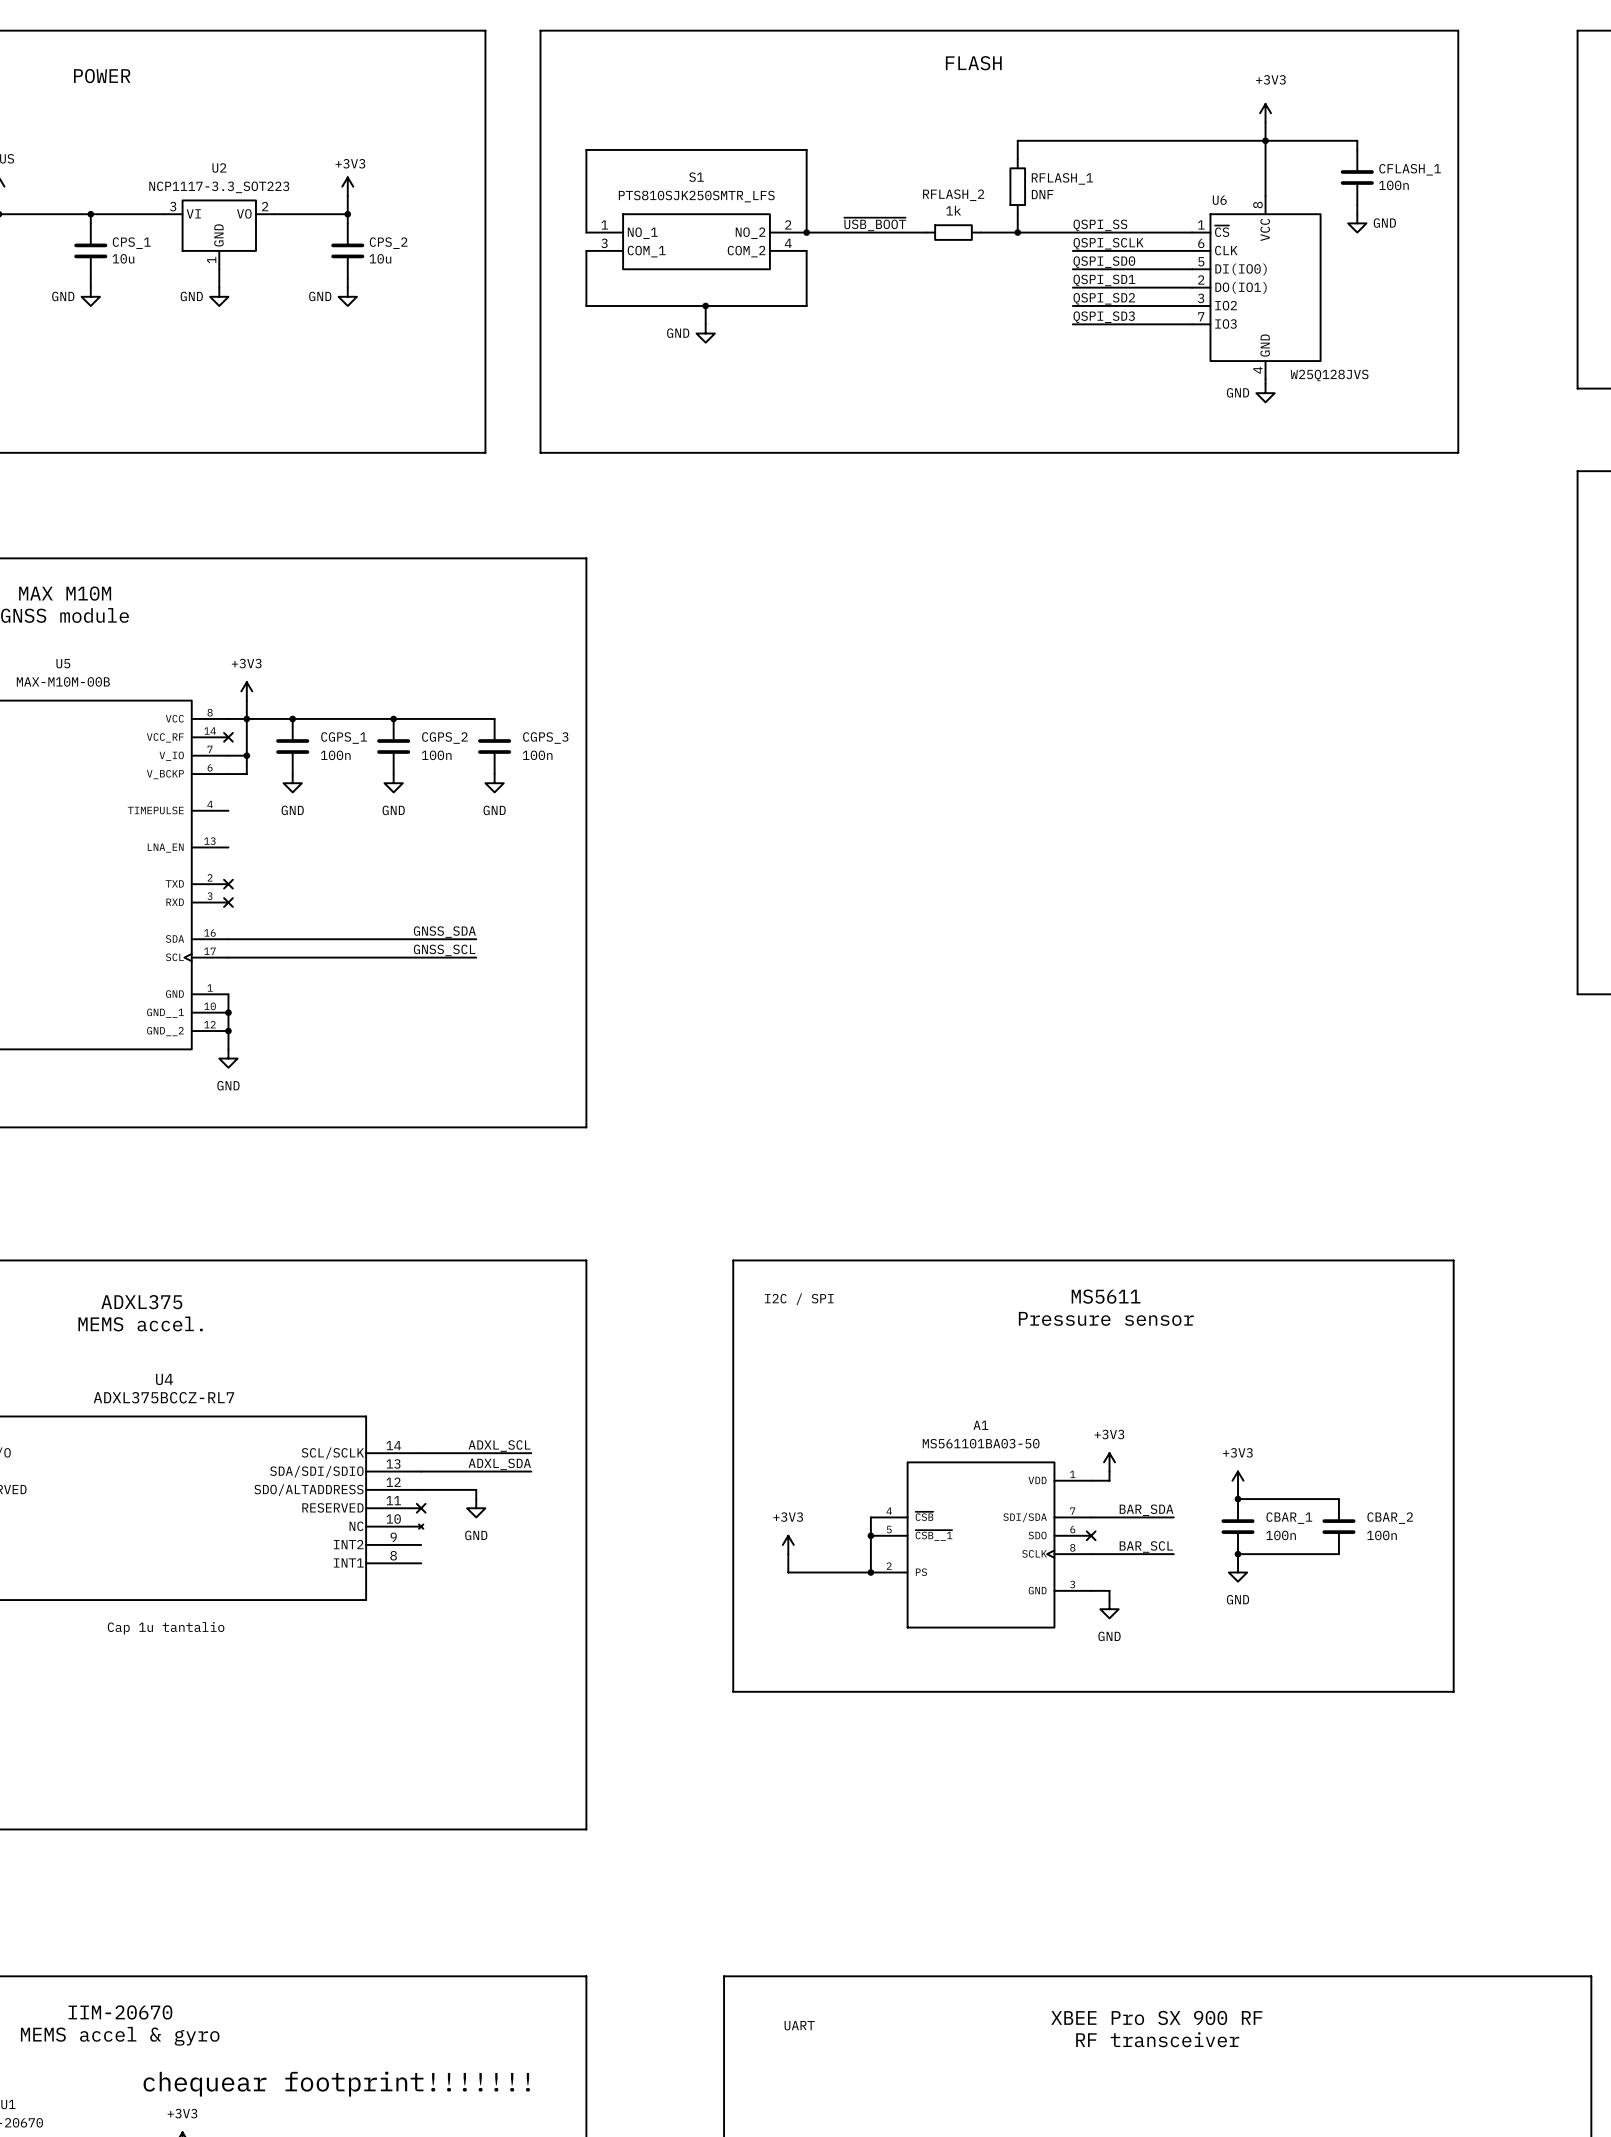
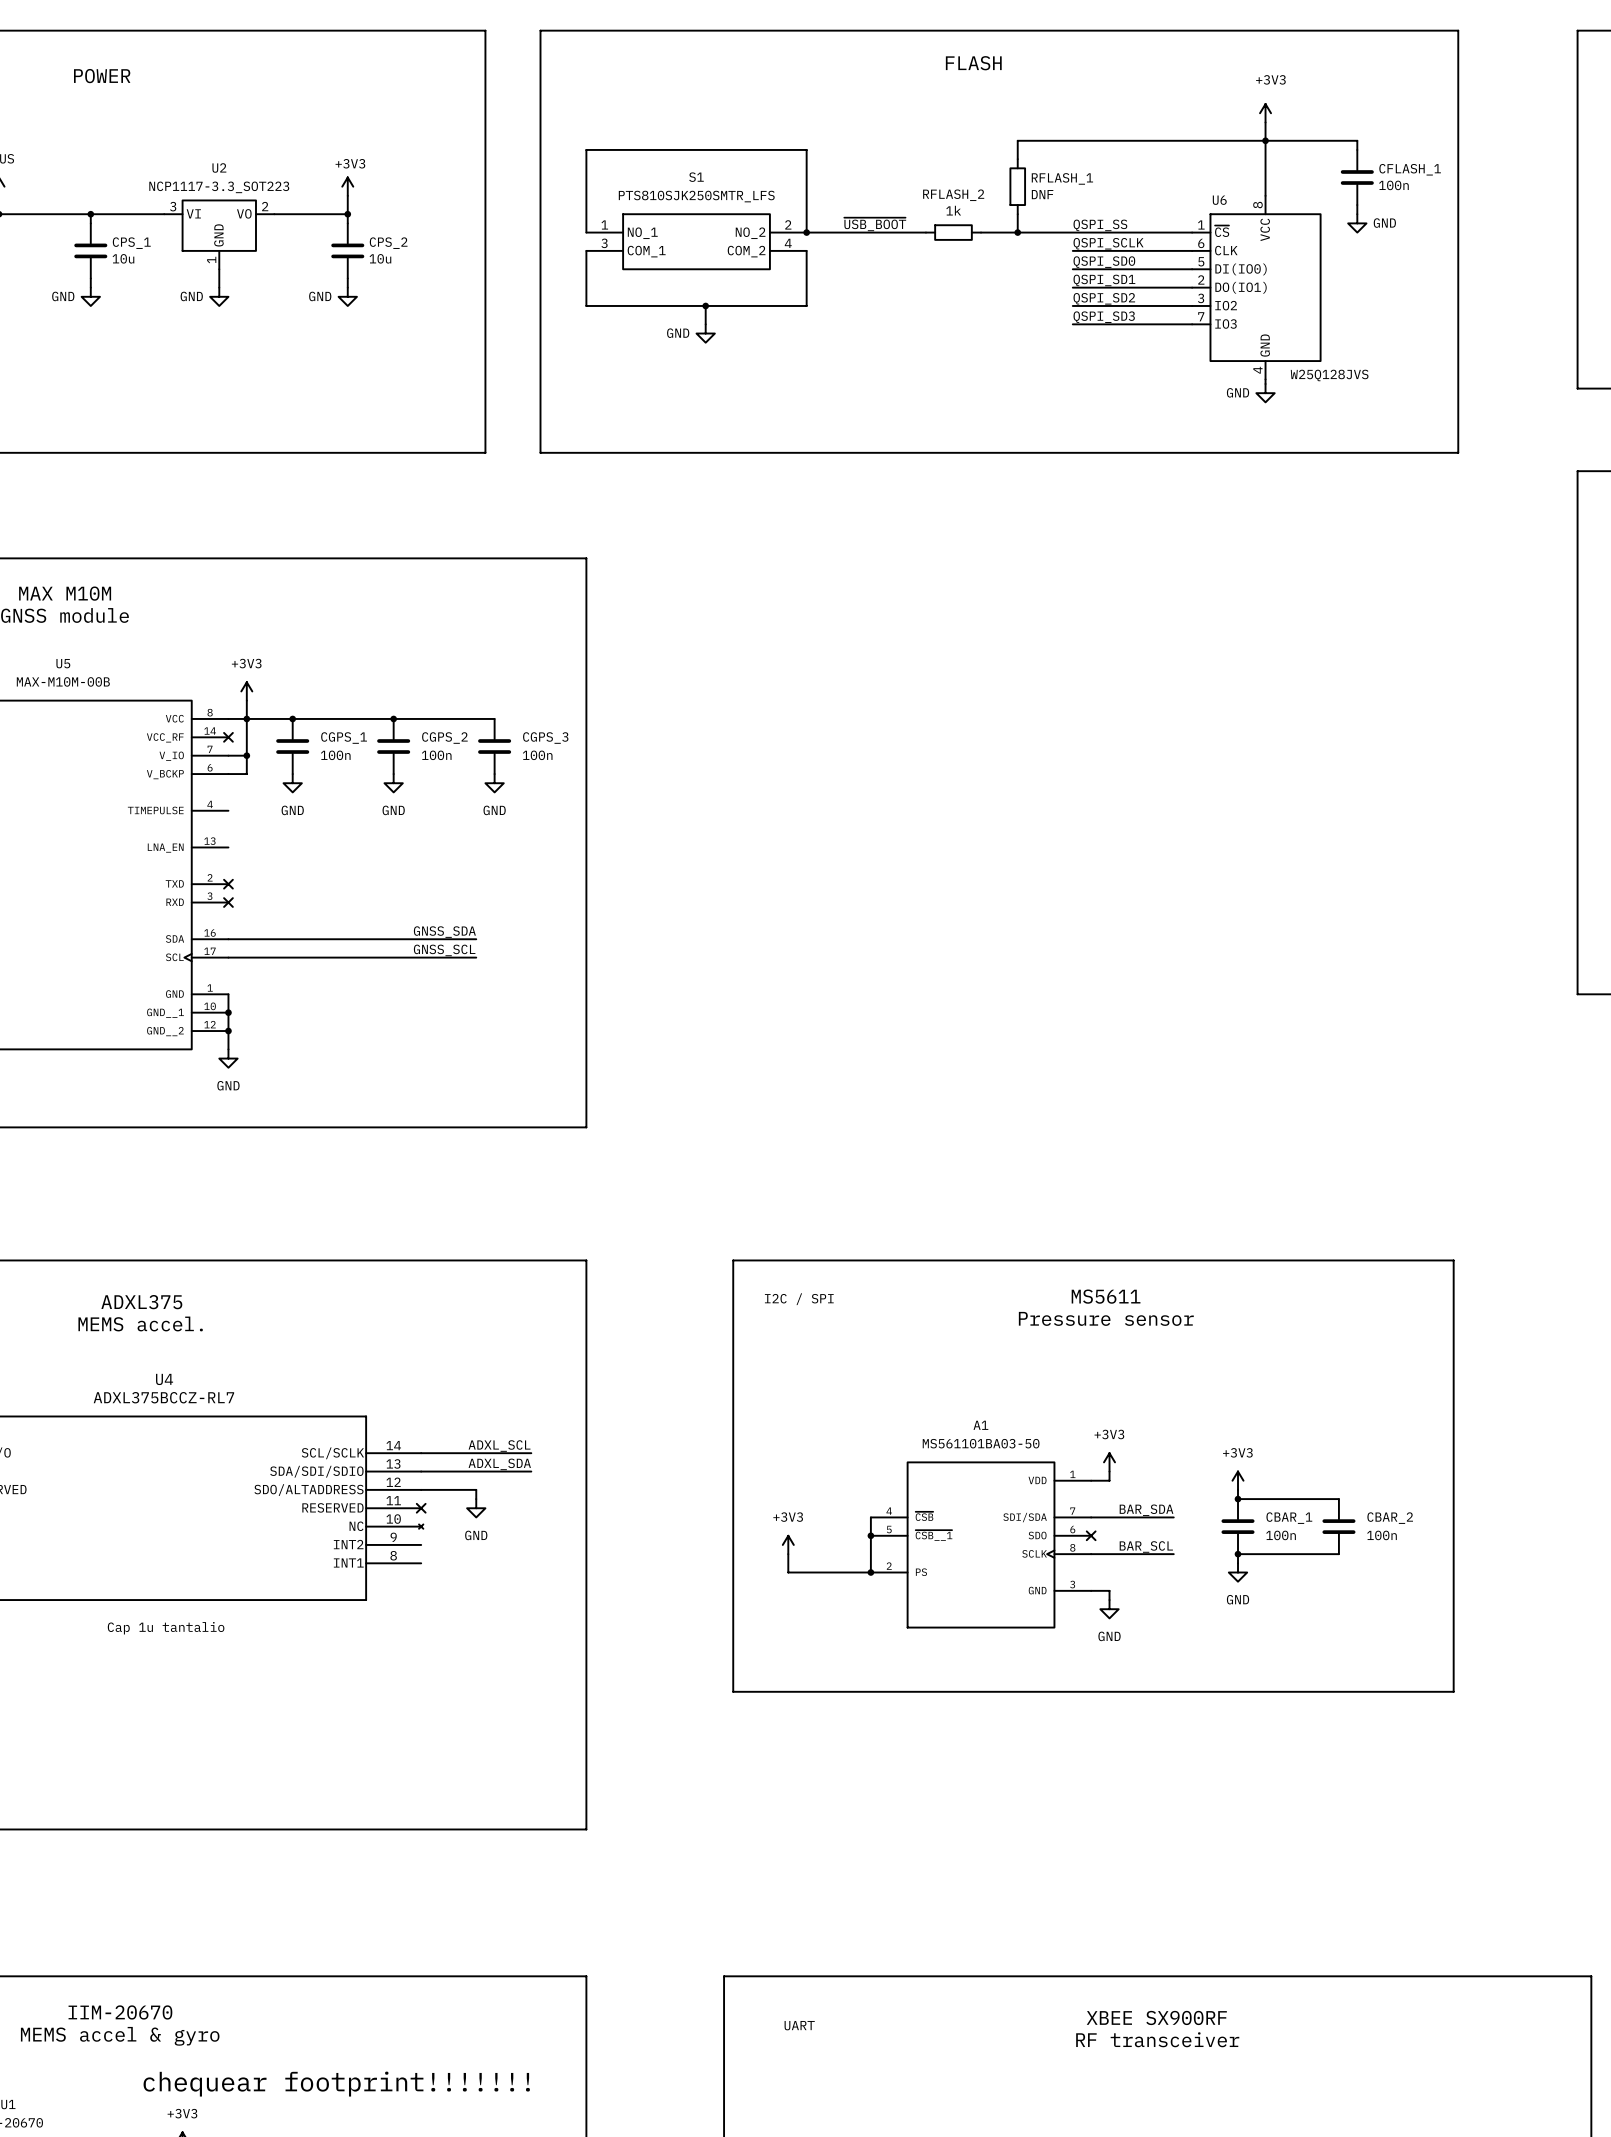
text: XBEE Pro SX 900 RF (1156, 2017) -> XBEE SX900RF (1156, 2017)

